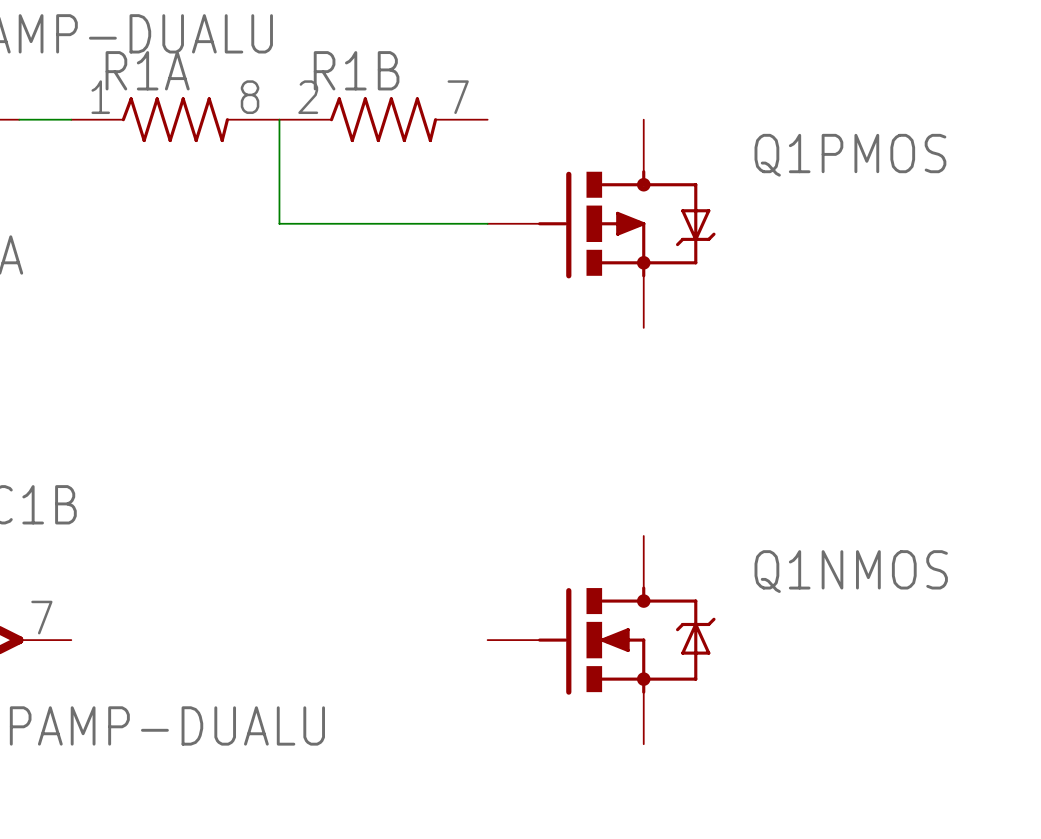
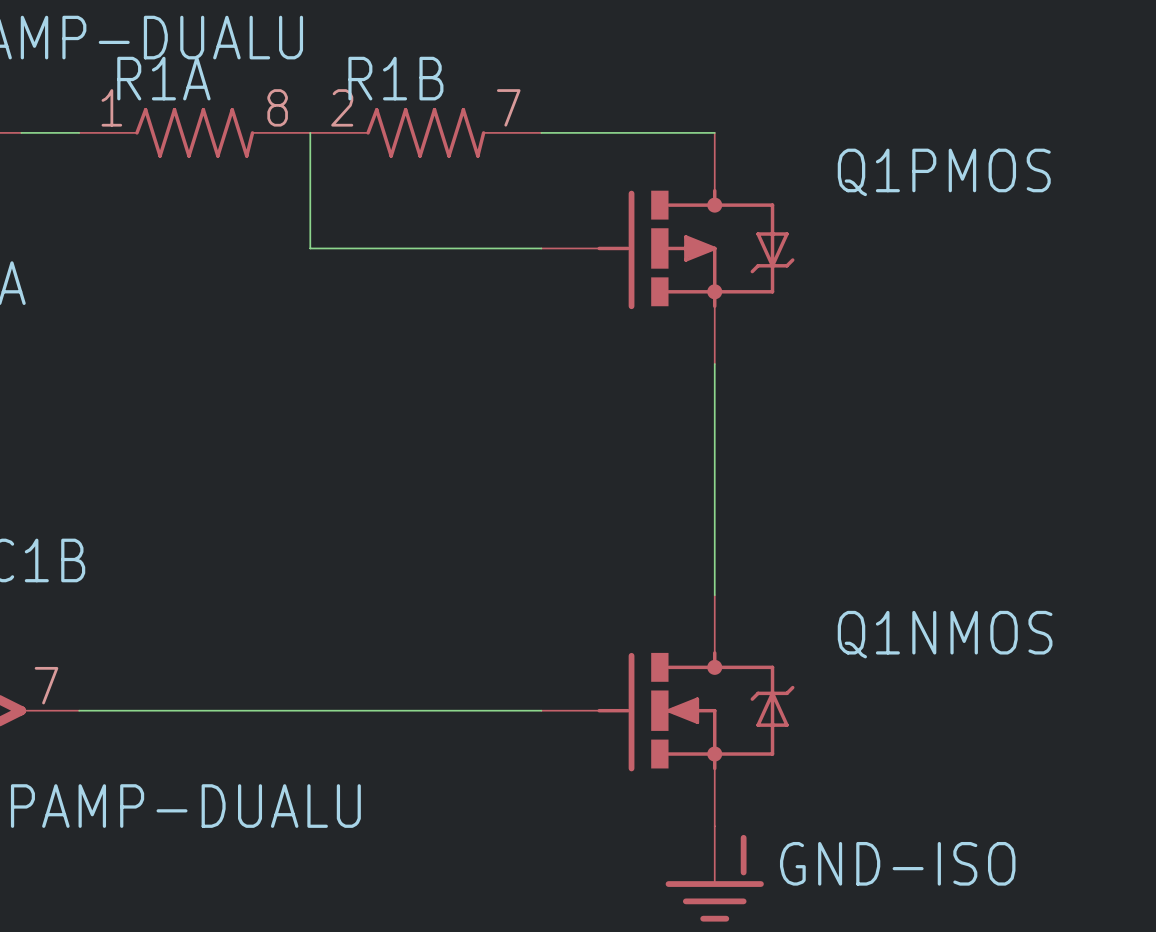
wire: none -> (541, 132) (714, 132)
wire: none -> (714, 364) (714, 595)
wire: none -> (79, 710) (541, 710)
power symbol: none -> GND-ISO (714, 873)

